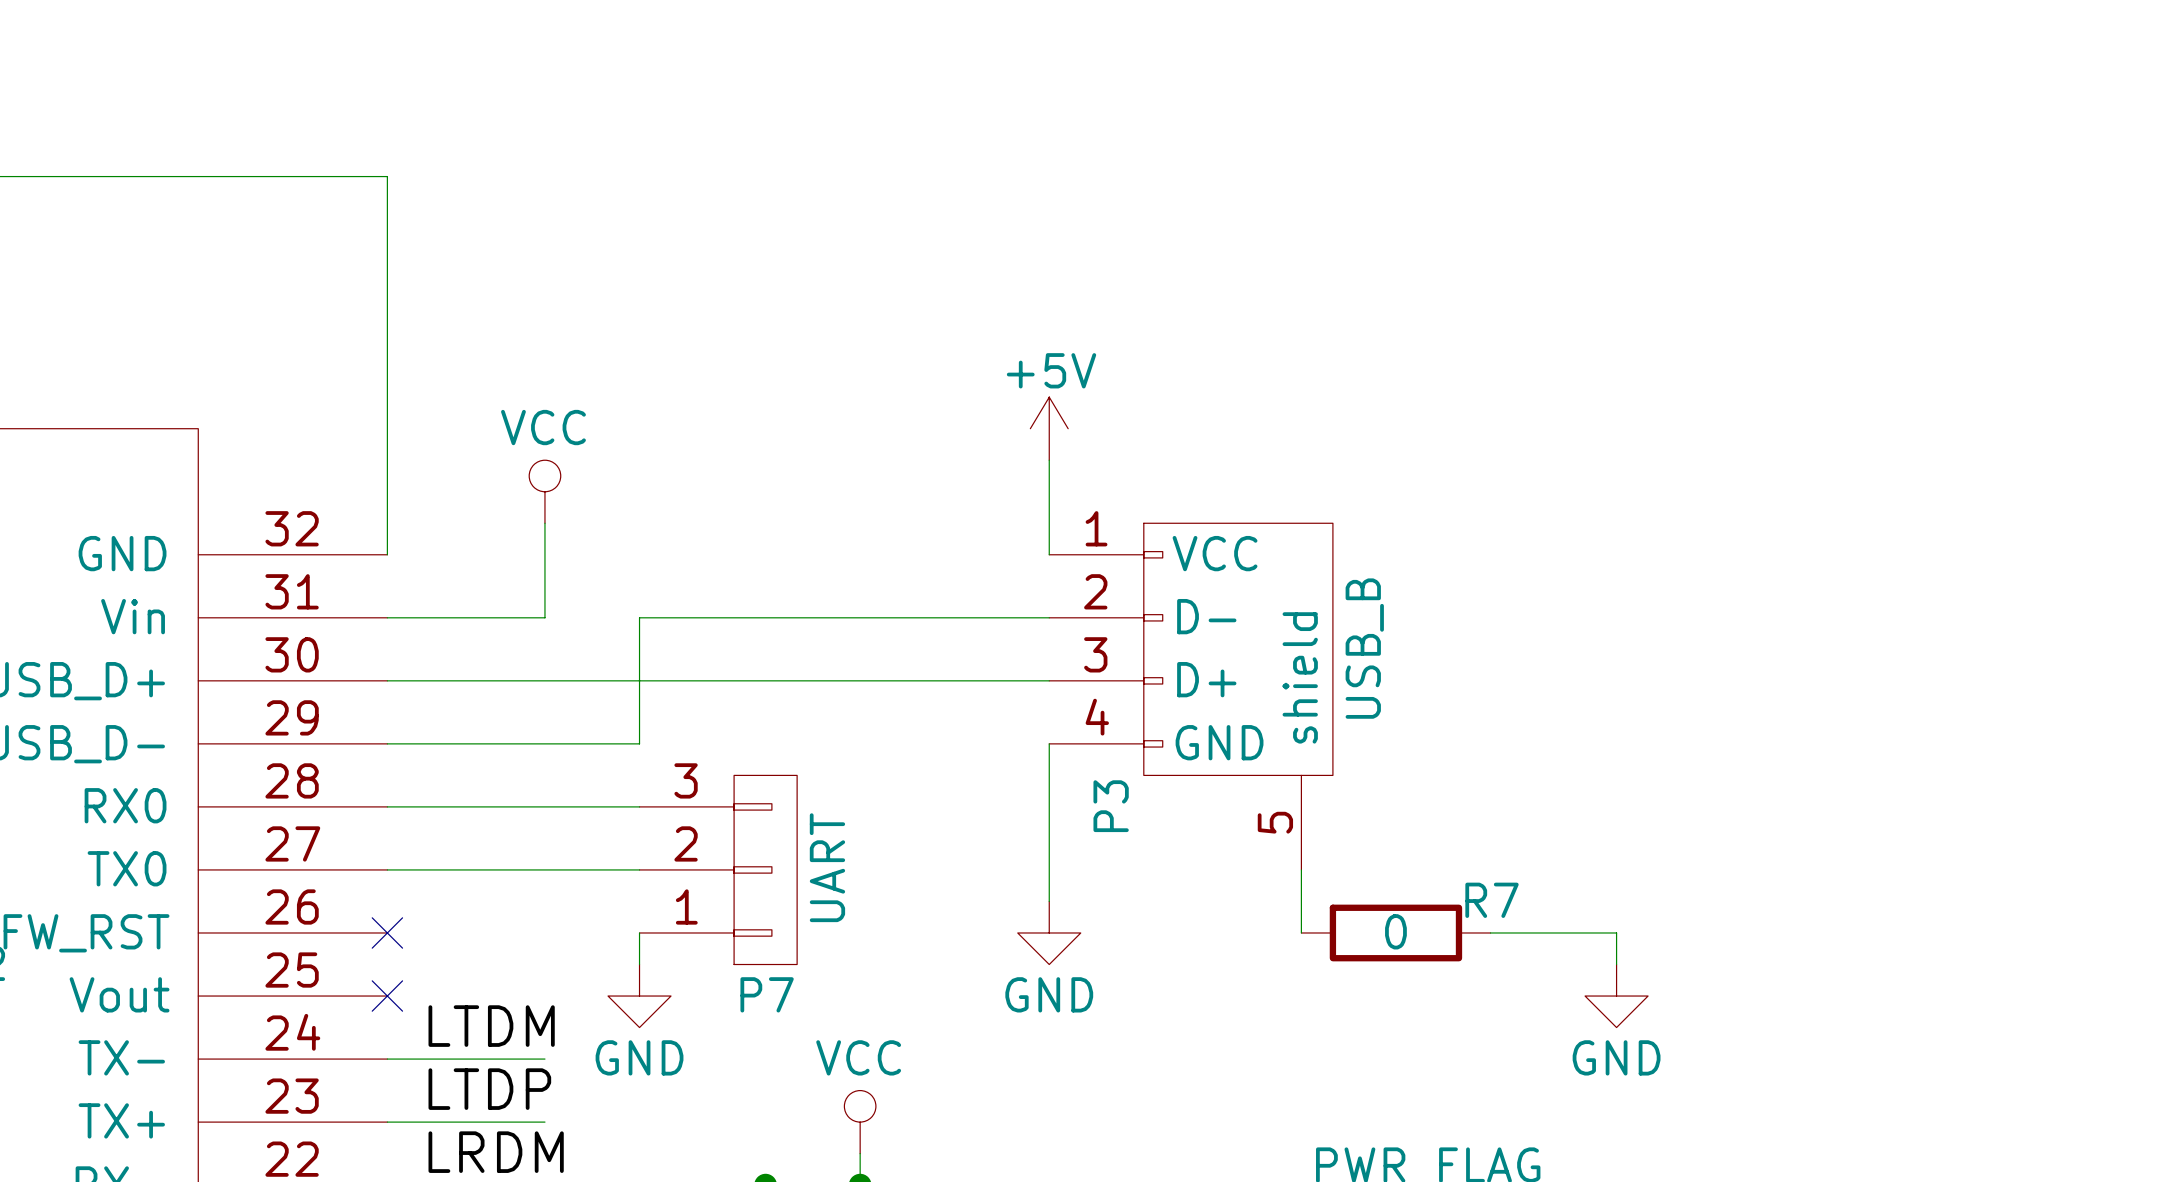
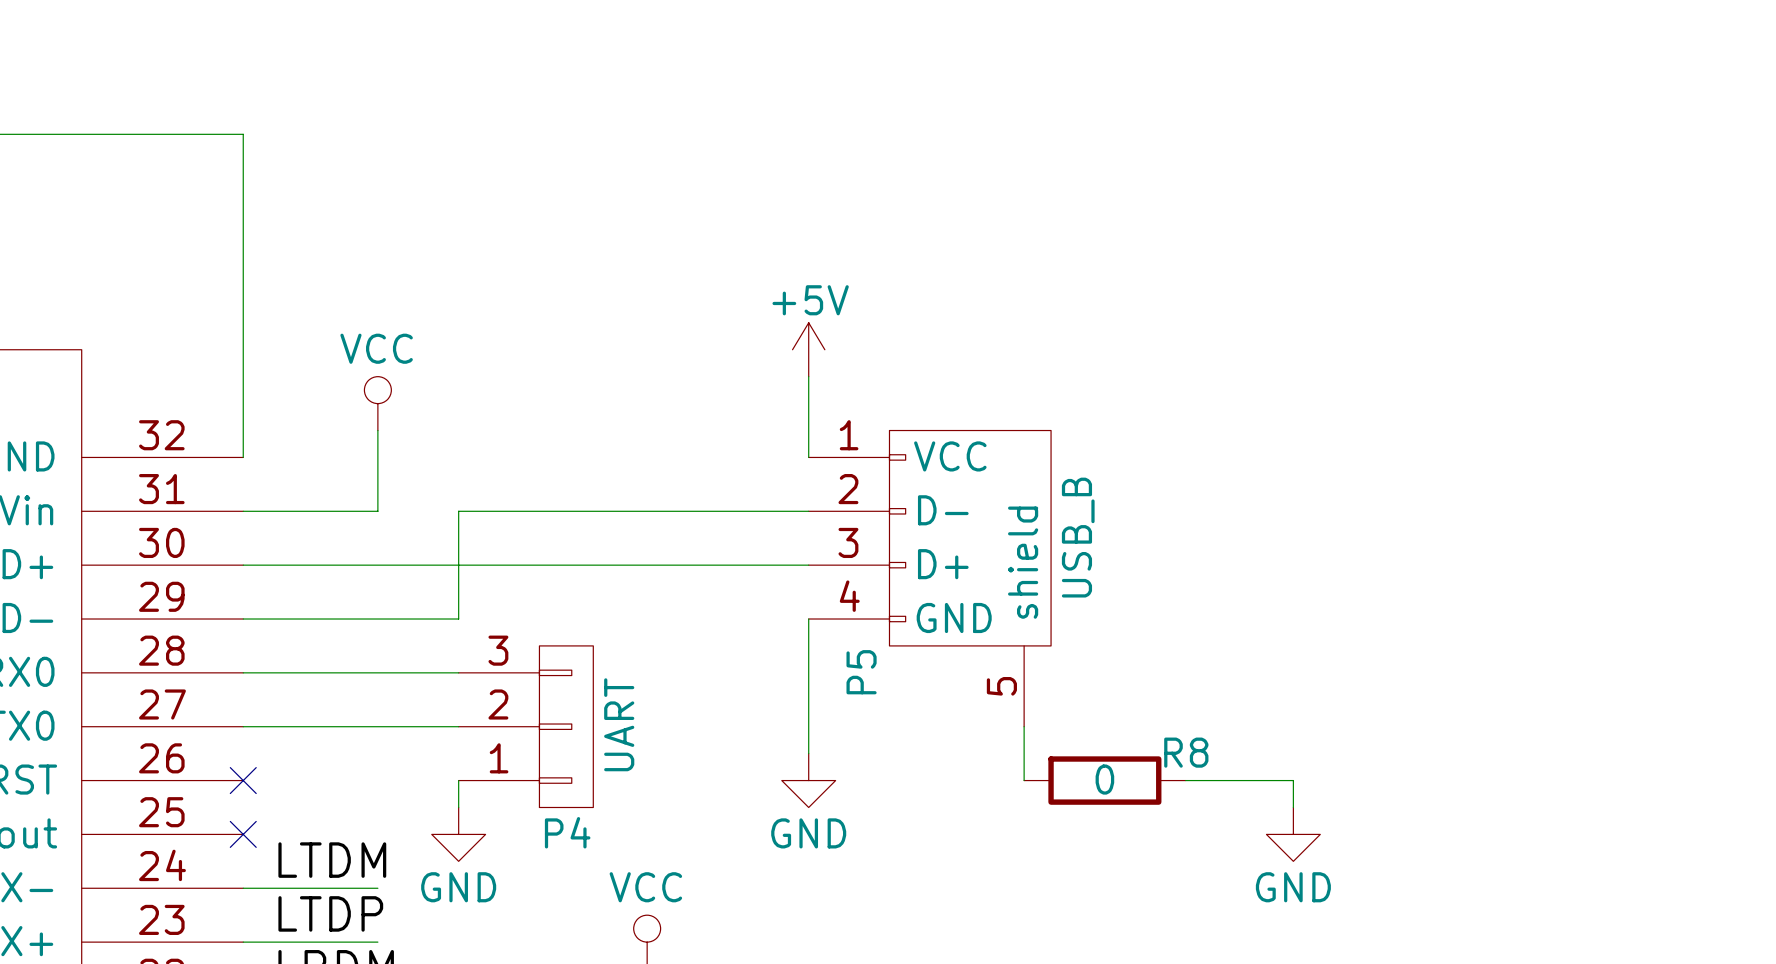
P3 name: P3 (1111, 806) -> P5 (861, 672)
R7 name: R7 (1492, 900) -> R8 (1186, 752)
P7 name: P7 (767, 994) -> P4 (567, 832)

